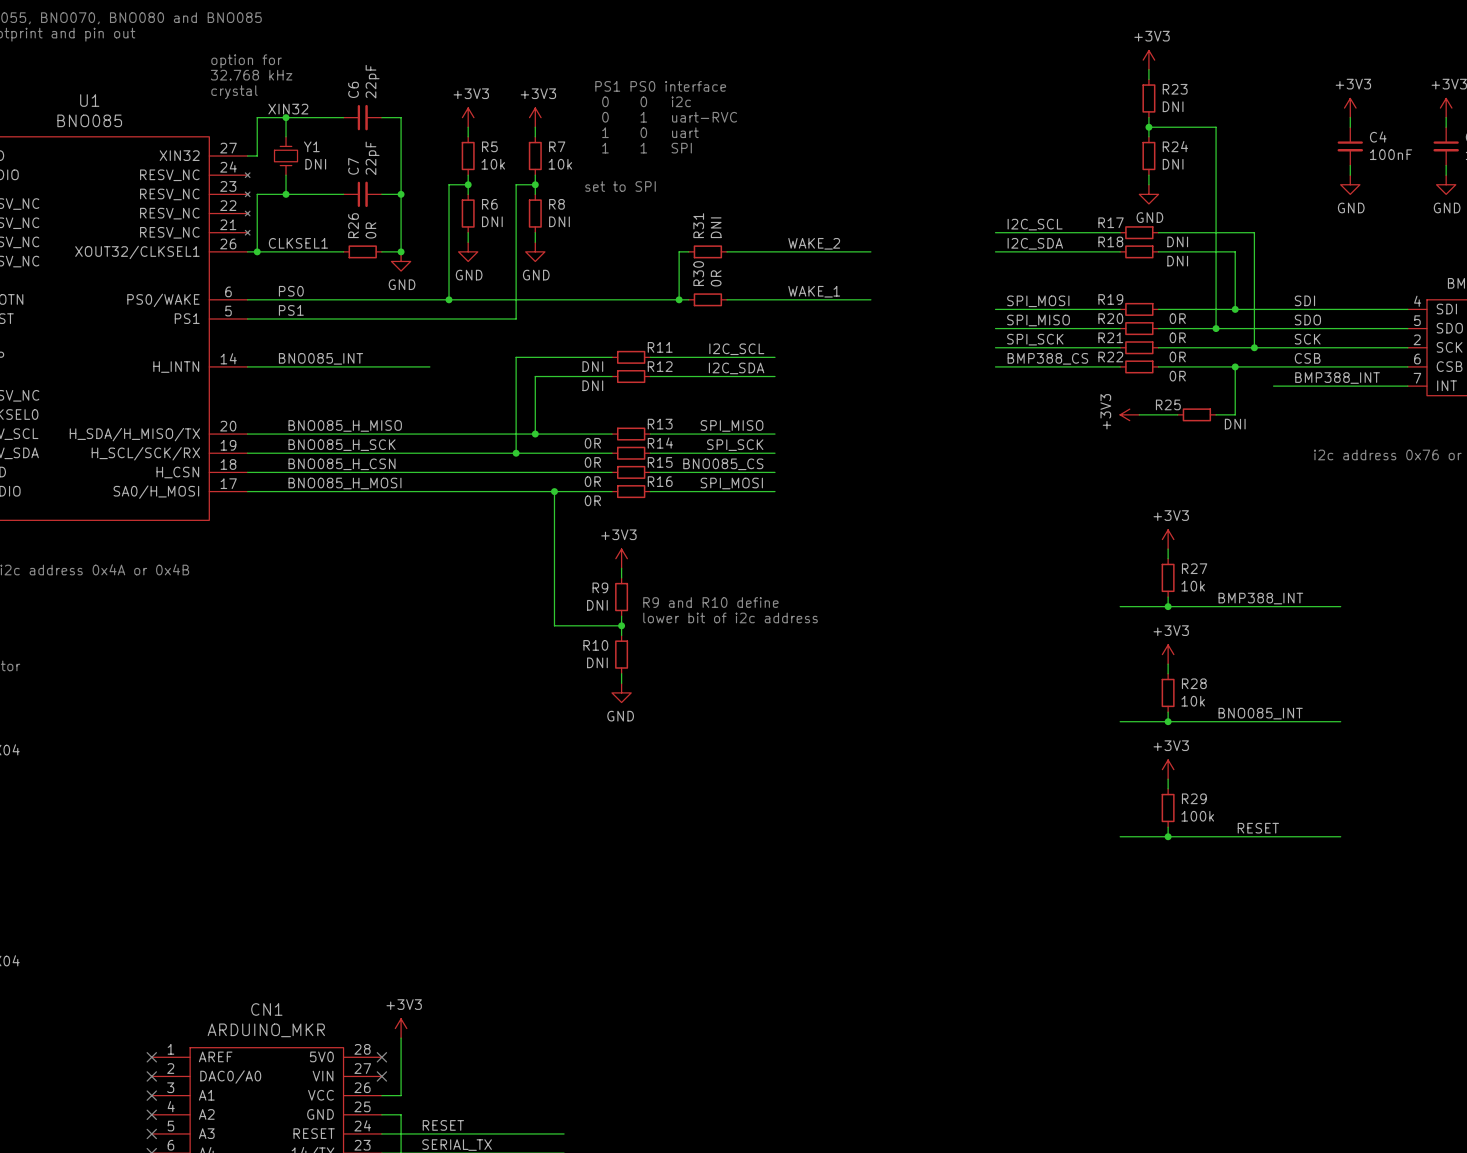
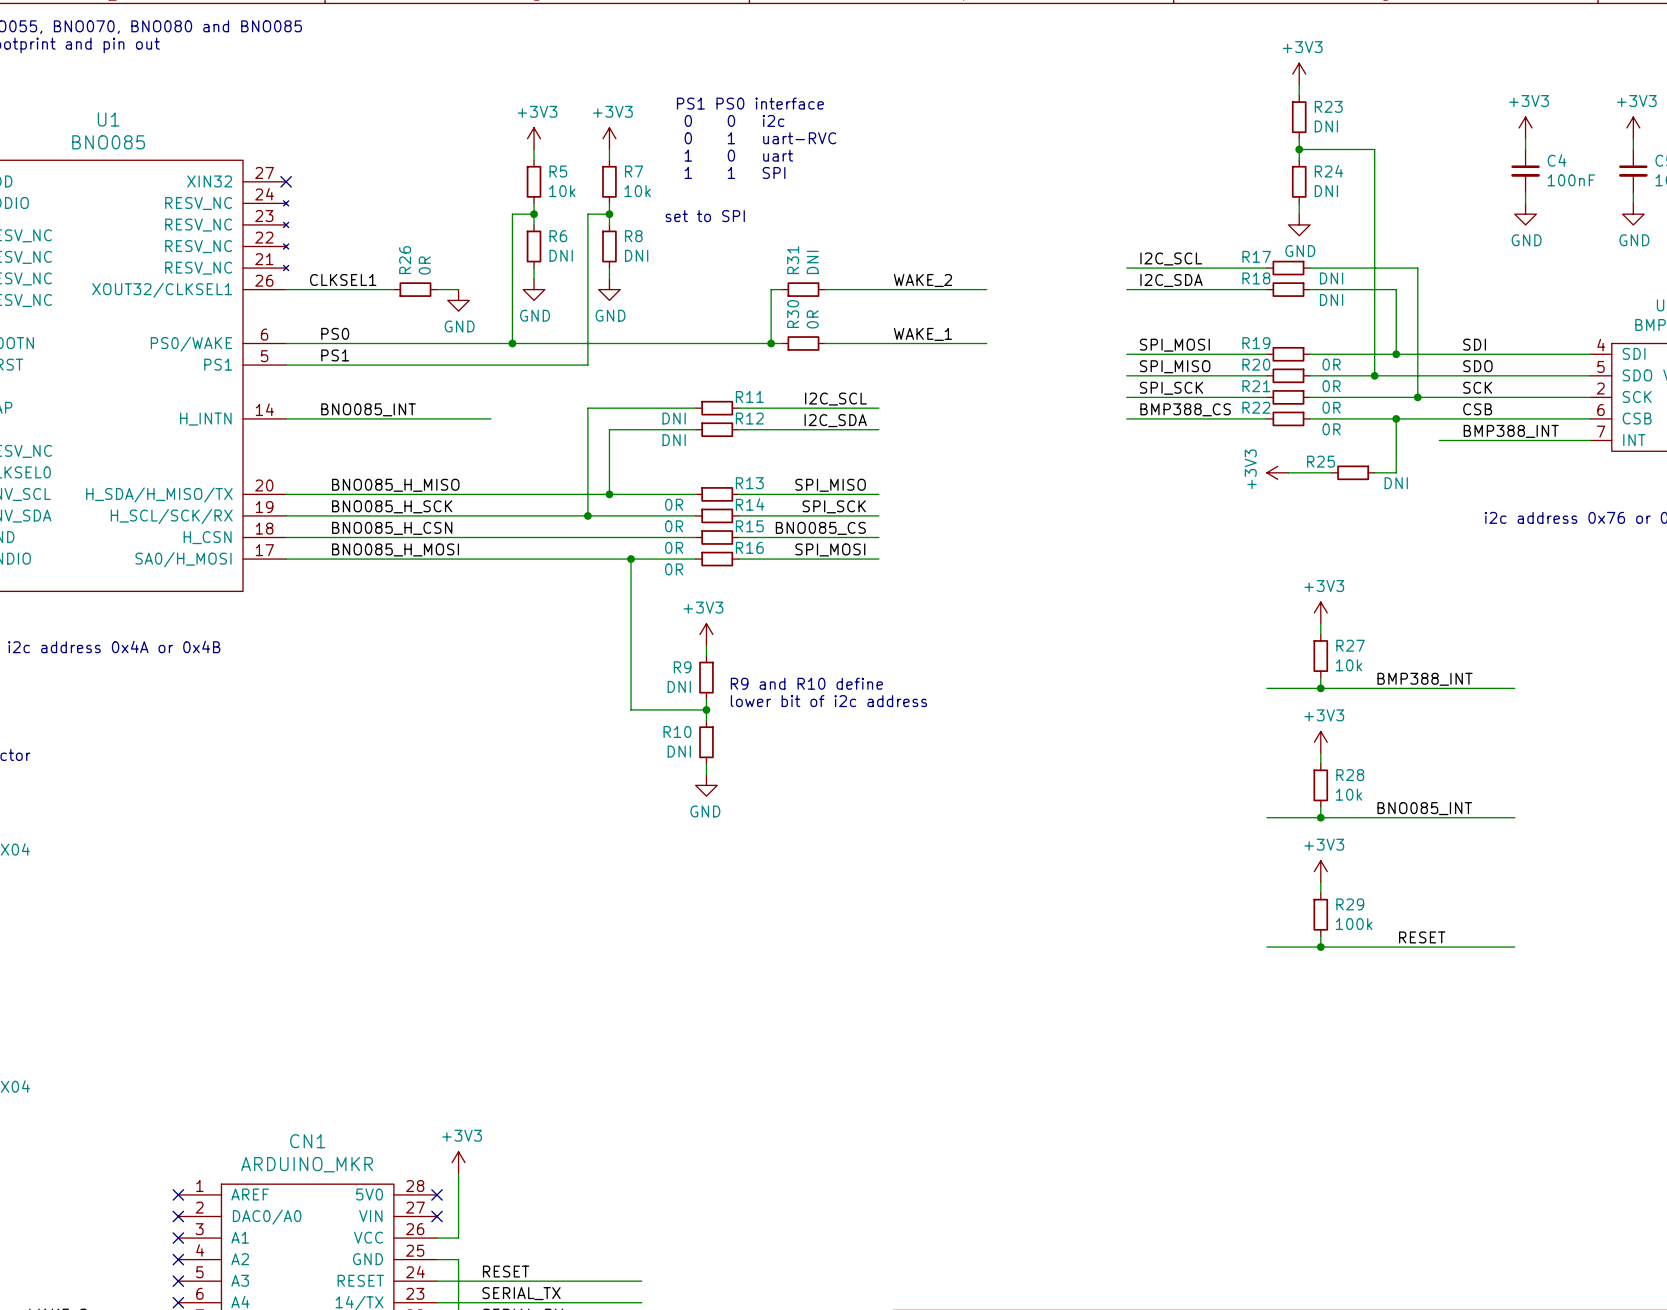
text: option for (246, 61) -> none
text: 32.768 kHz (251, 75) -> none
text: crystal (234, 92) -> none
label: XIN32 (288, 109) -> none
wire: (286, 117) (286, 136) -> none
junction: (286, 117) -> none
wire: (343, 117) (257, 117) (257, 156) (247, 156) -> none
C6: 22pF (362, 117) -> none
wire: (381, 117) (401, 117) (401, 251) -> none
no-connect mark: none -> (286, 181)
Y1: DNI (286, 156) -> none
wire: (286, 175) (286, 194) -> none
junction: (286, 194) -> none
wire: (343, 194) (257, 194) (257, 251) -> none
C7: 22pF (362, 194) -> none
wire: (381, 194) (401, 194) -> none
junction: (401, 194) -> none
junction: (257, 251) -> none
junction: (401, 251) -> none

